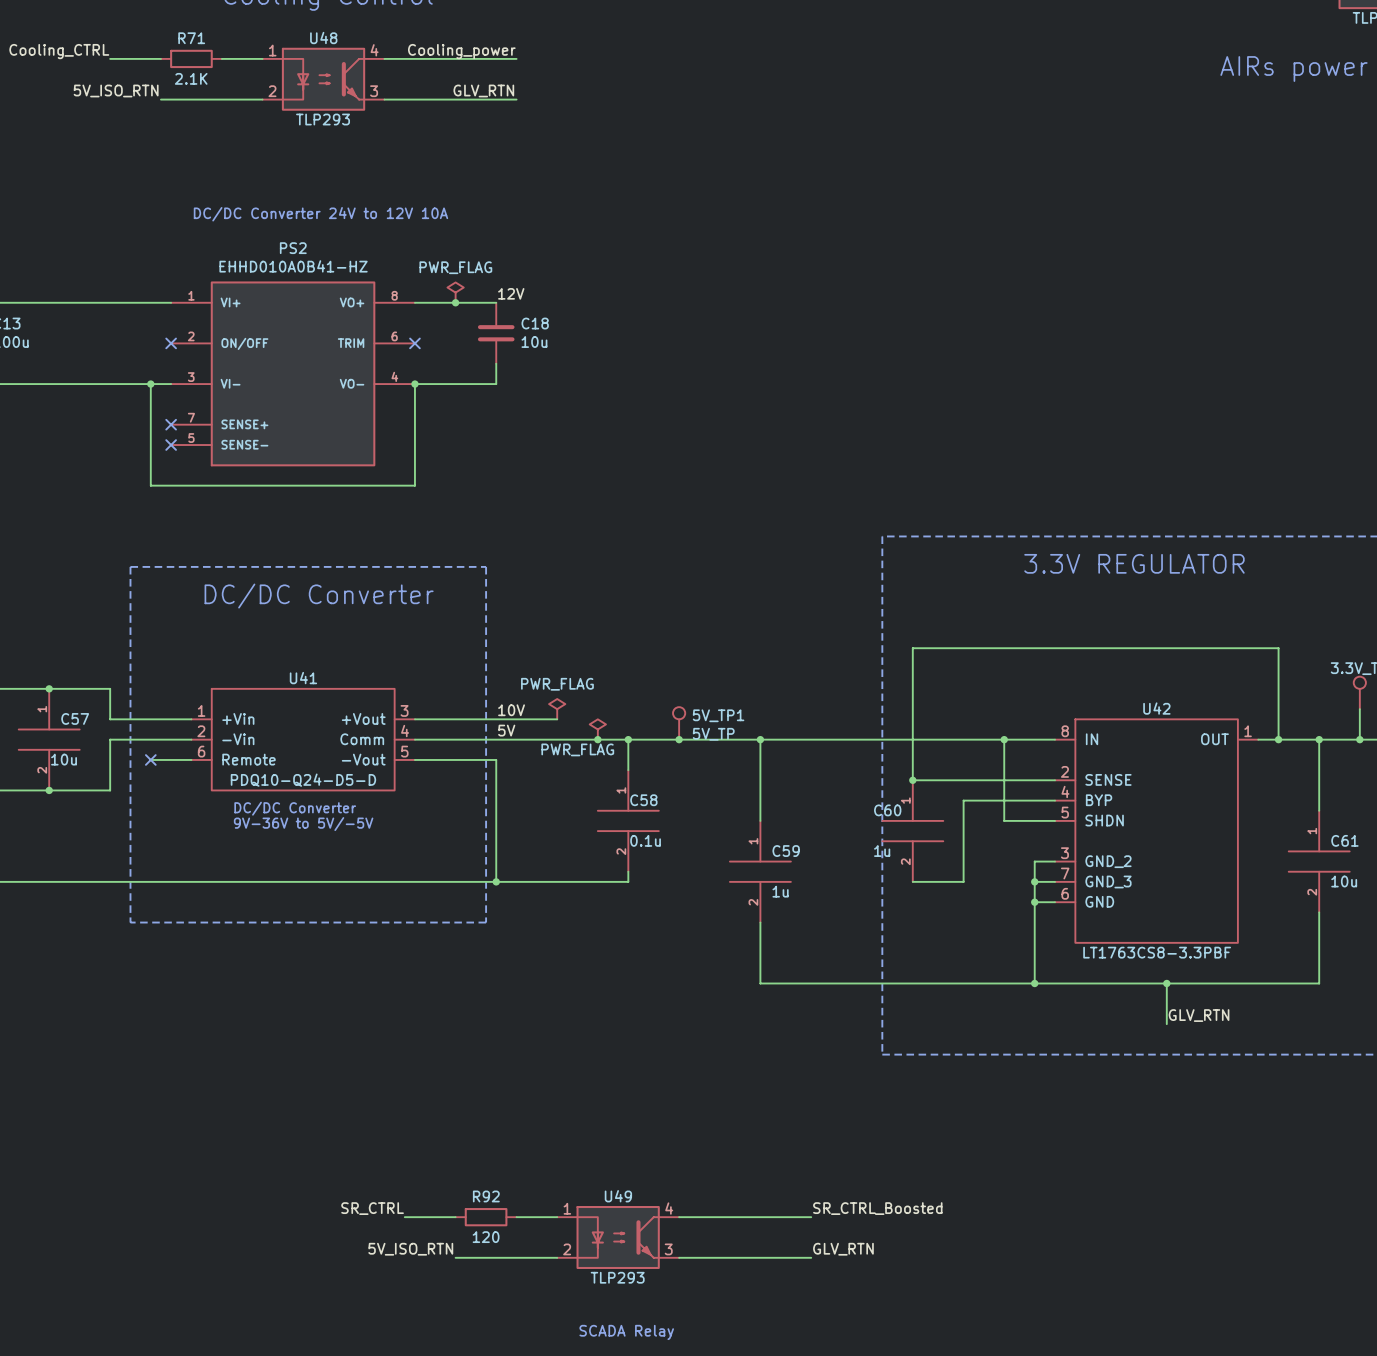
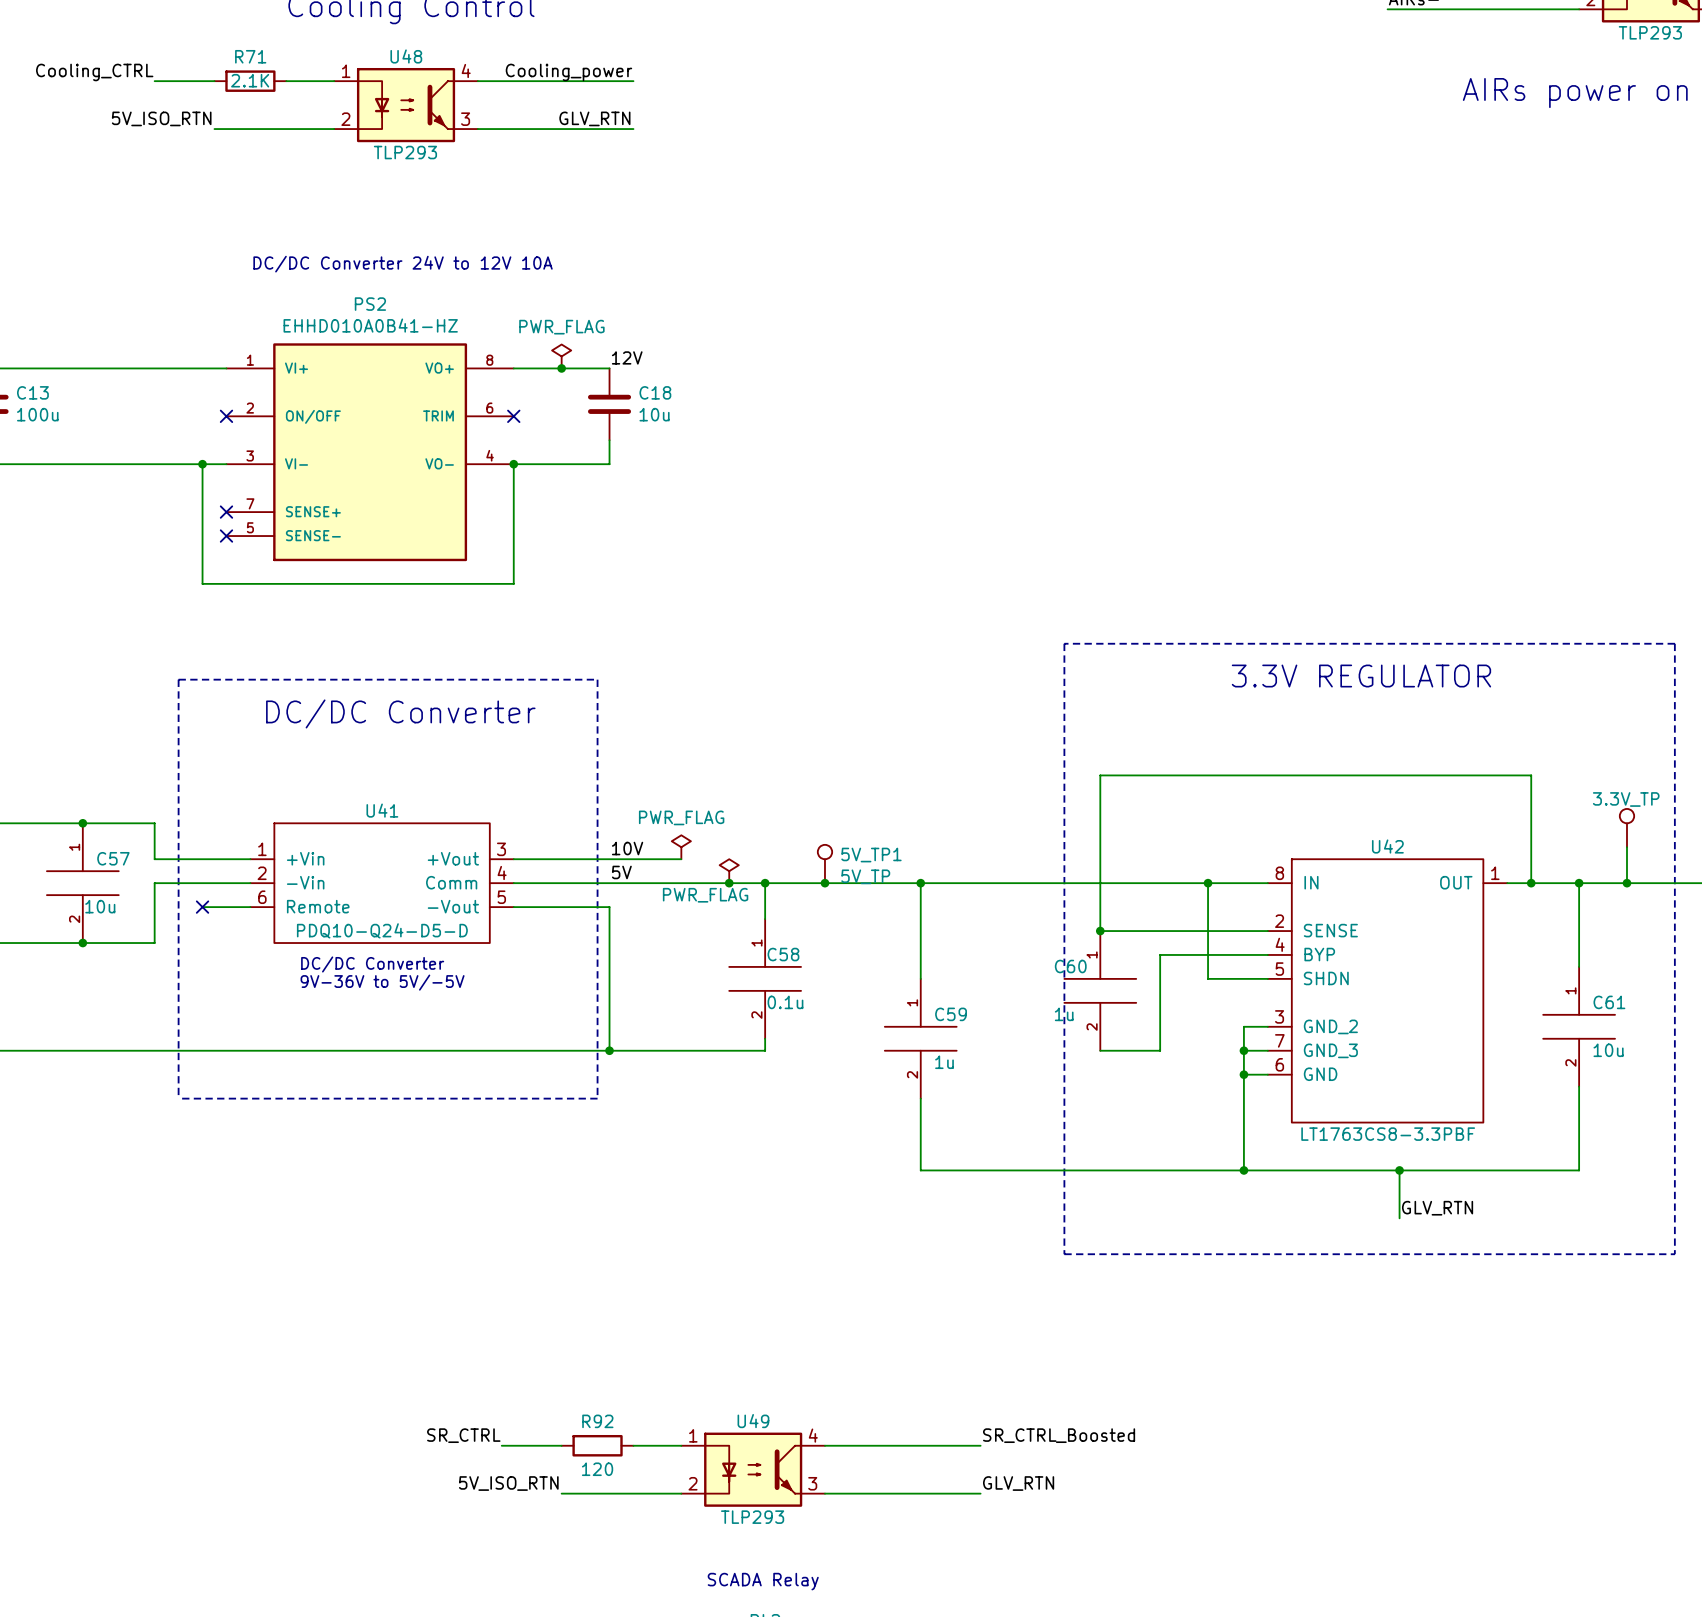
R71 value position: 2.1K (191, 78) -> 2.1K (250, 80)

